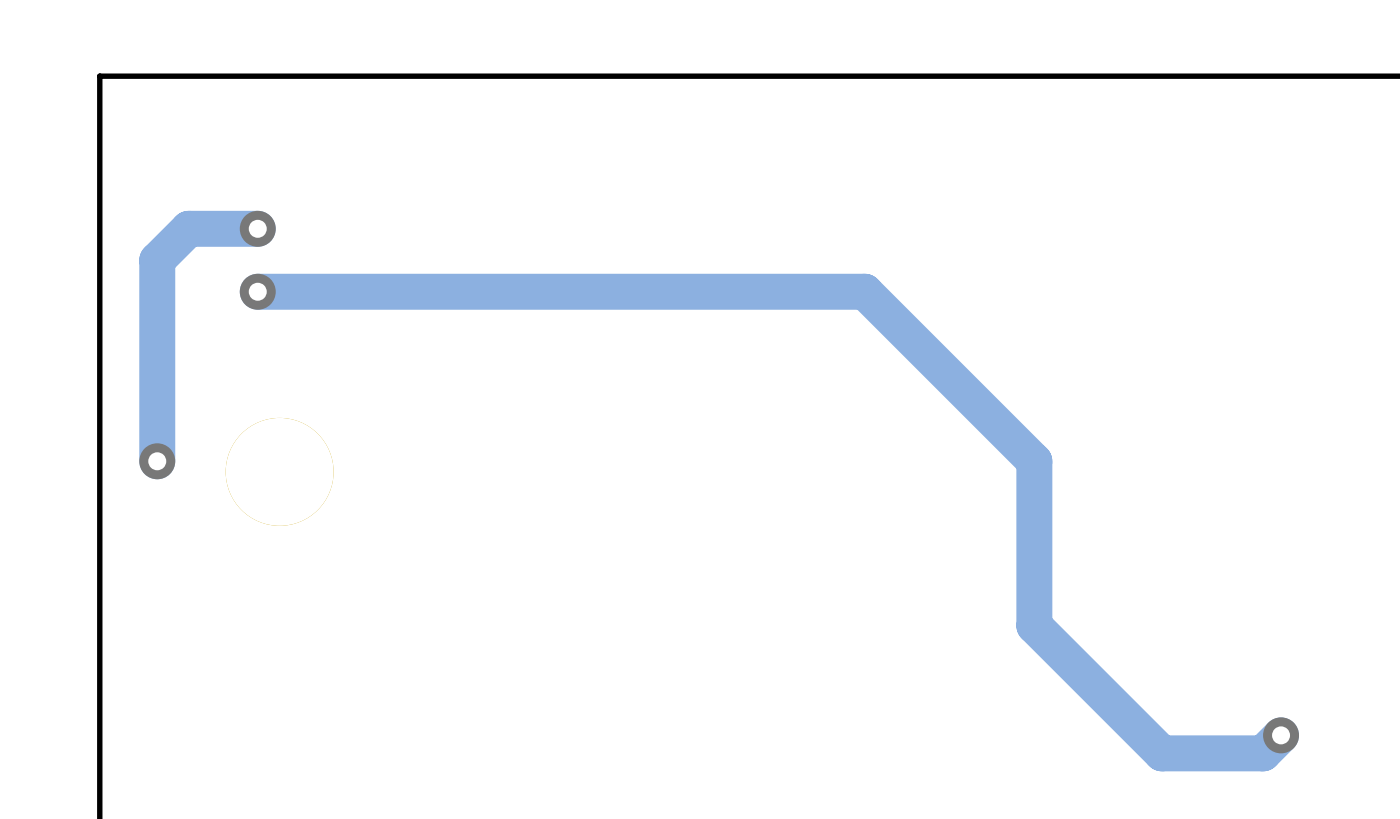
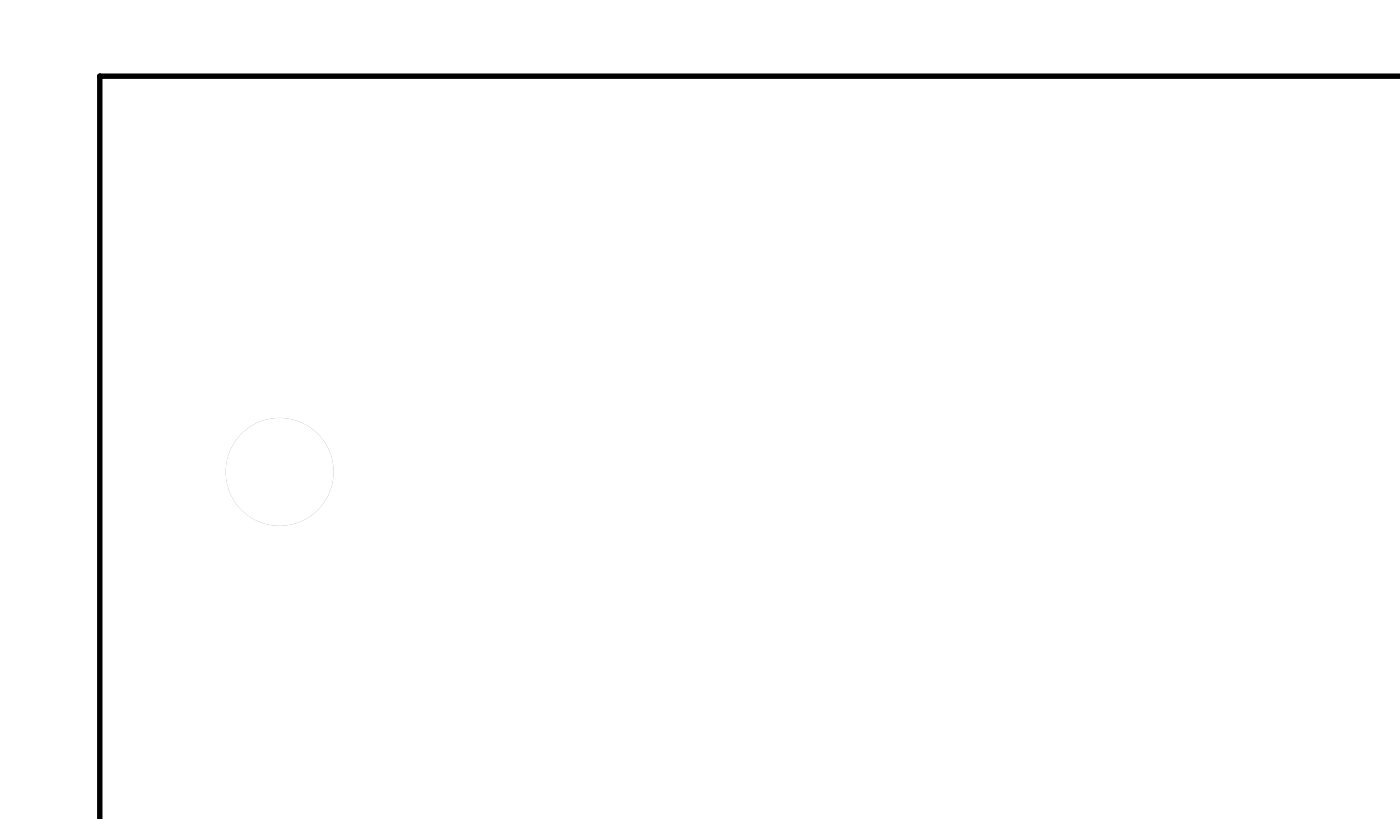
track: (257, 228) (188, 228) (157, 260) (157, 461) -> none
via: (257, 228) -> none
track: (257, 291) (864, 291) (1034, 461) (1034, 625) (1161, 753) (1263, 753) (1281, 735) -> none
via: (257, 291) -> none
via: (157, 461) -> none
via: (1281, 735) -> none

